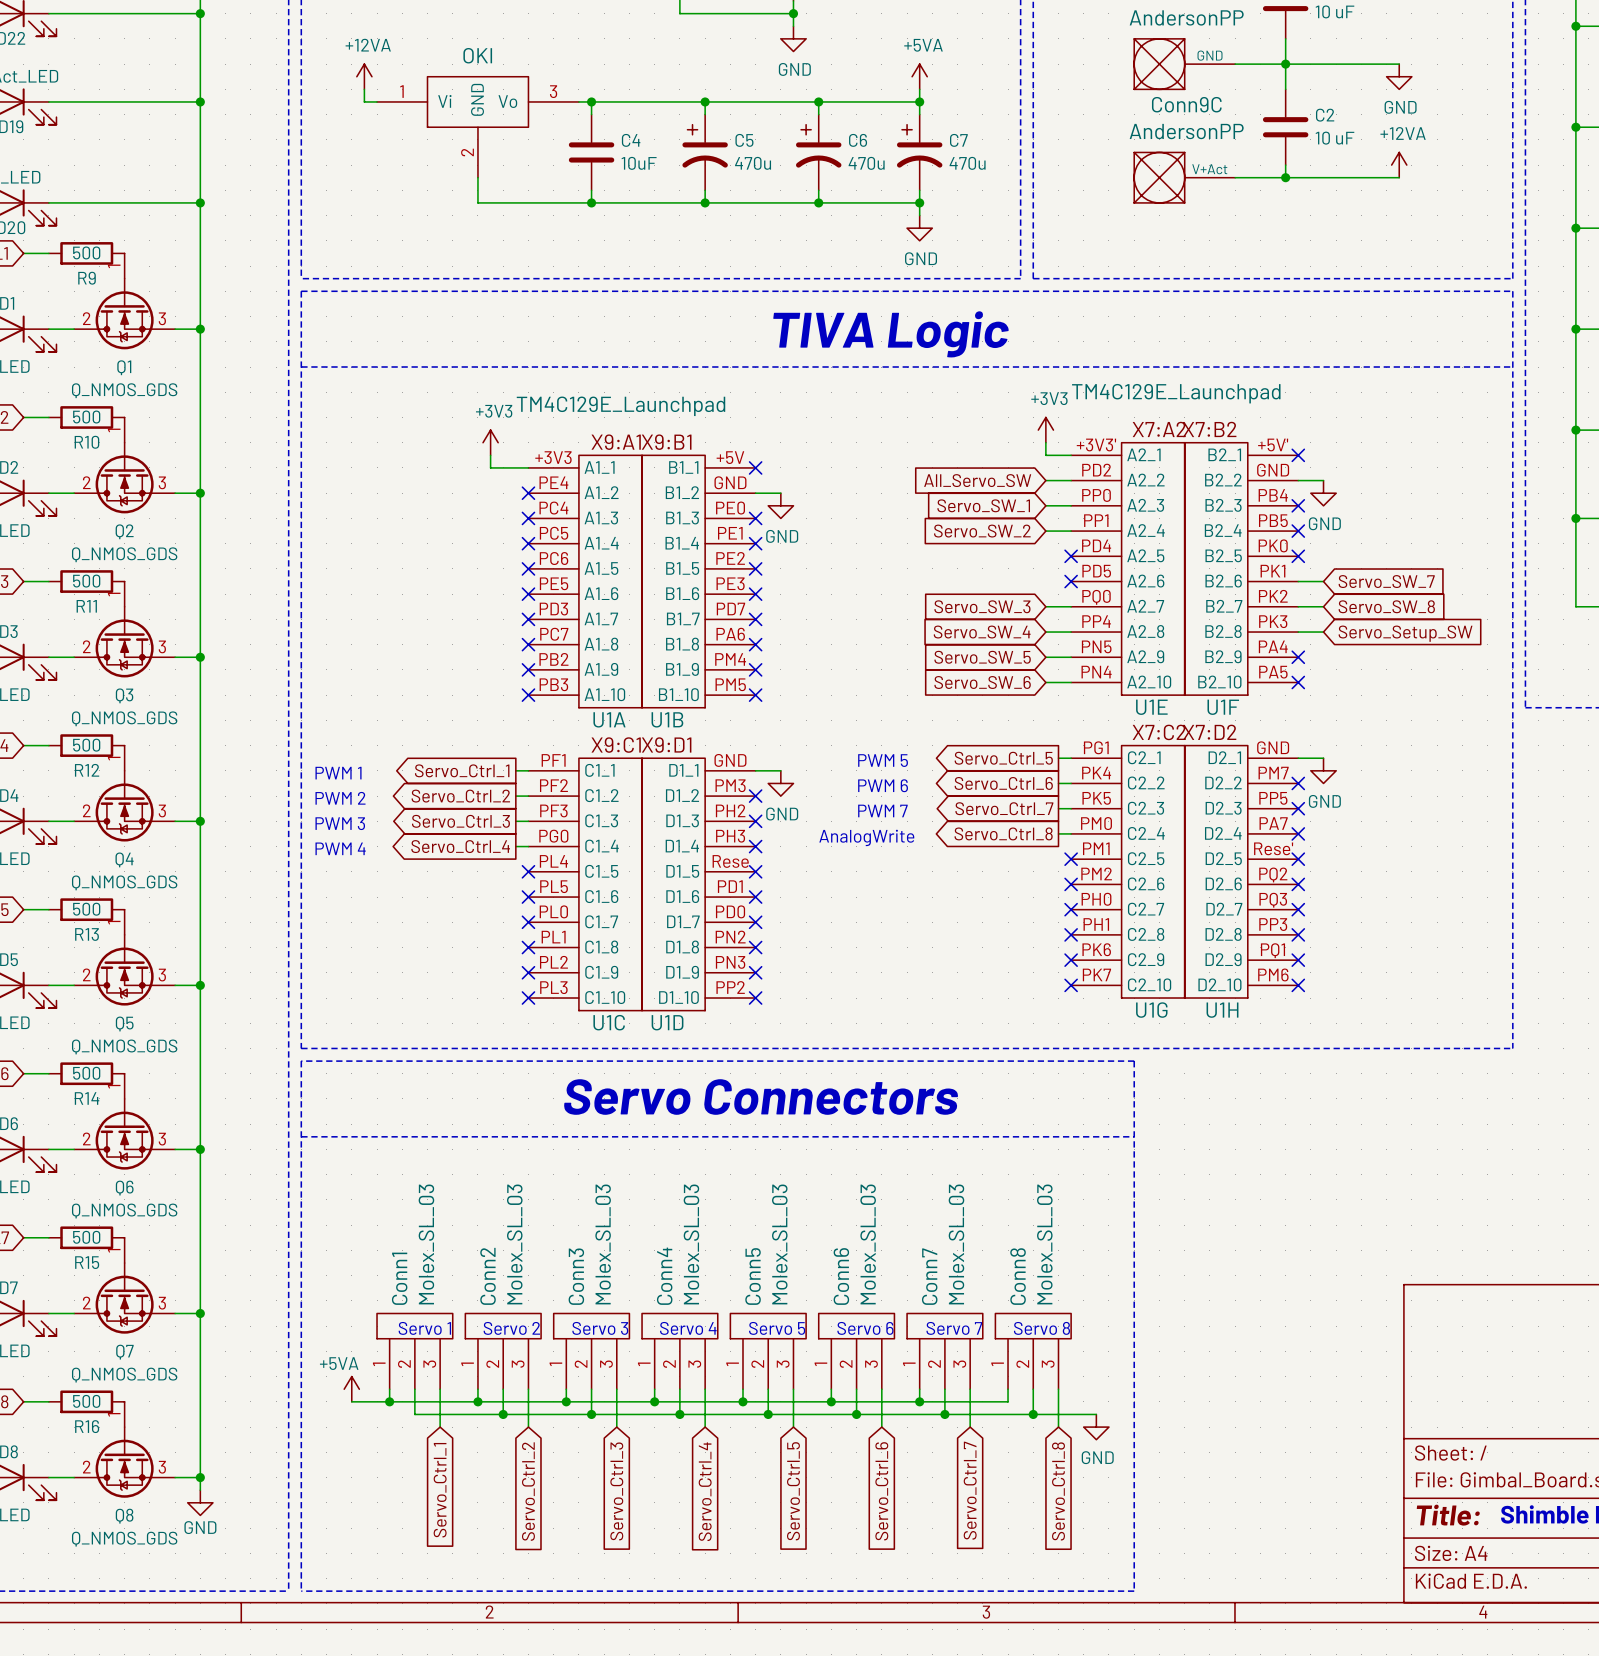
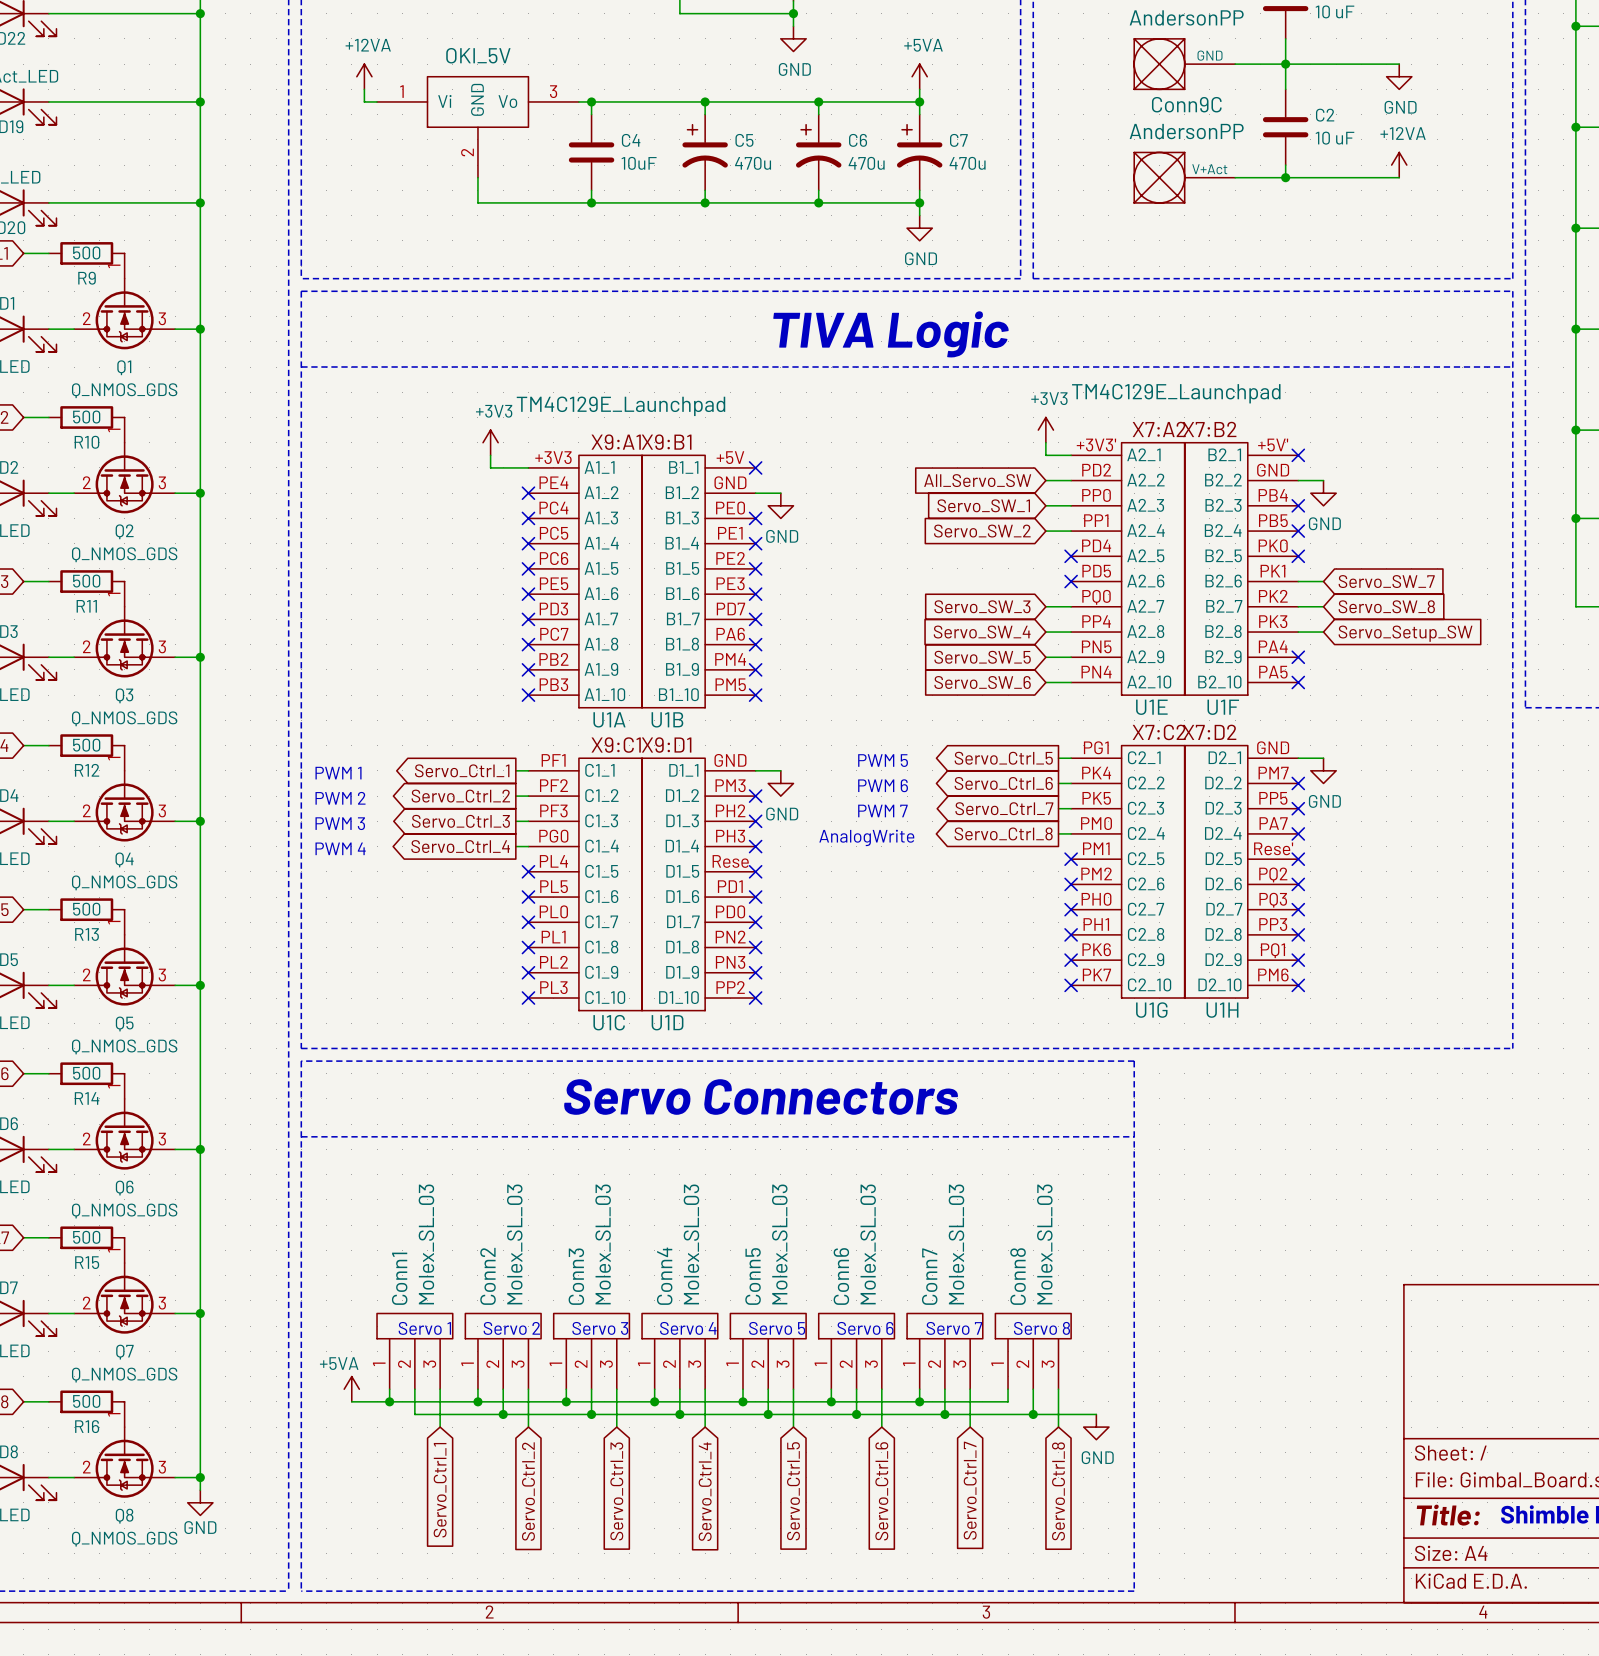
part value: OKI (477, 55) -> OKI_5V (478, 55)

